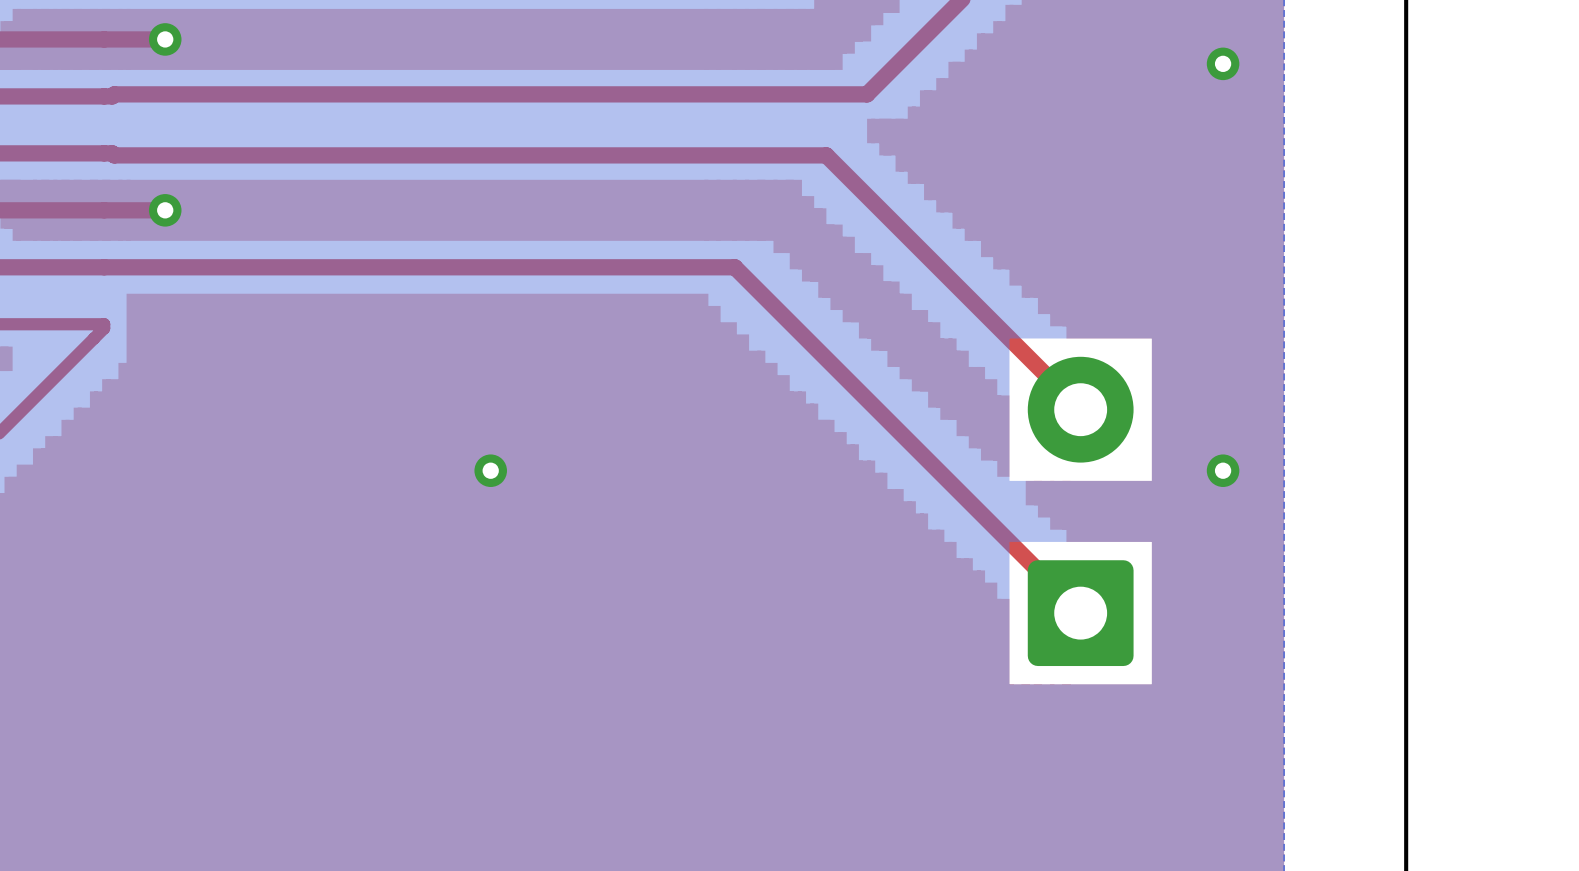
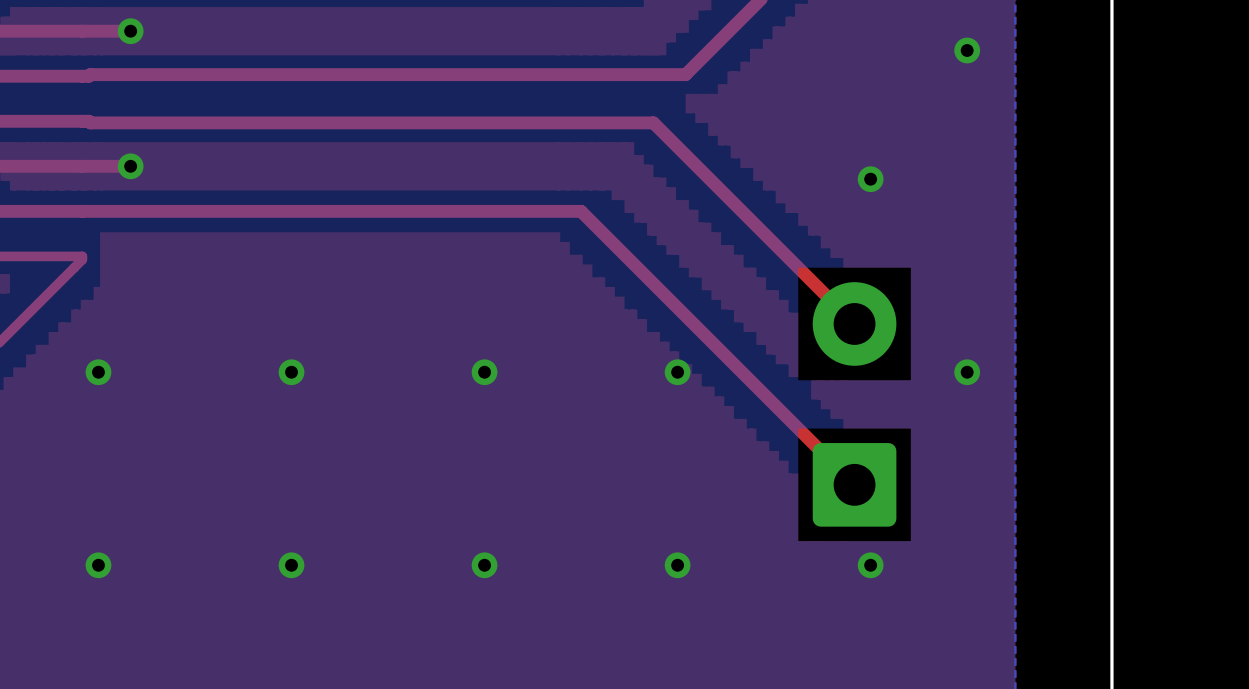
via: none -> (870, 179)
via: none -> (98, 372)
via: none -> (291, 372)
via: (490, 470) -> none
via: none -> (484, 372)
via: none -> (677, 372)
via: none -> (98, 565)
via: none -> (291, 565)
via: none -> (484, 565)
via: none -> (677, 565)
via: none -> (870, 565)

